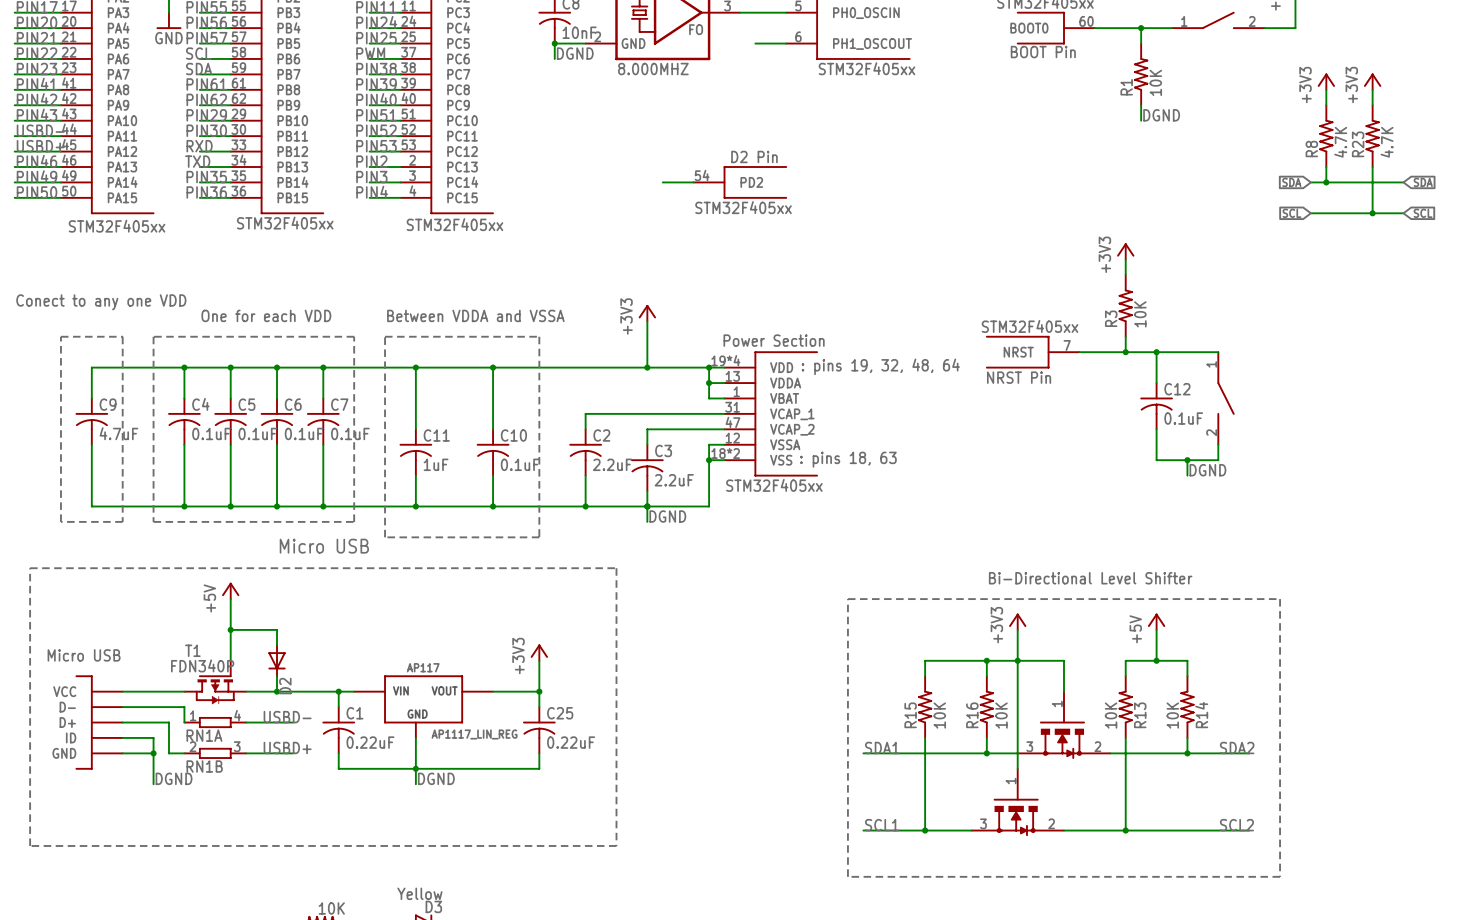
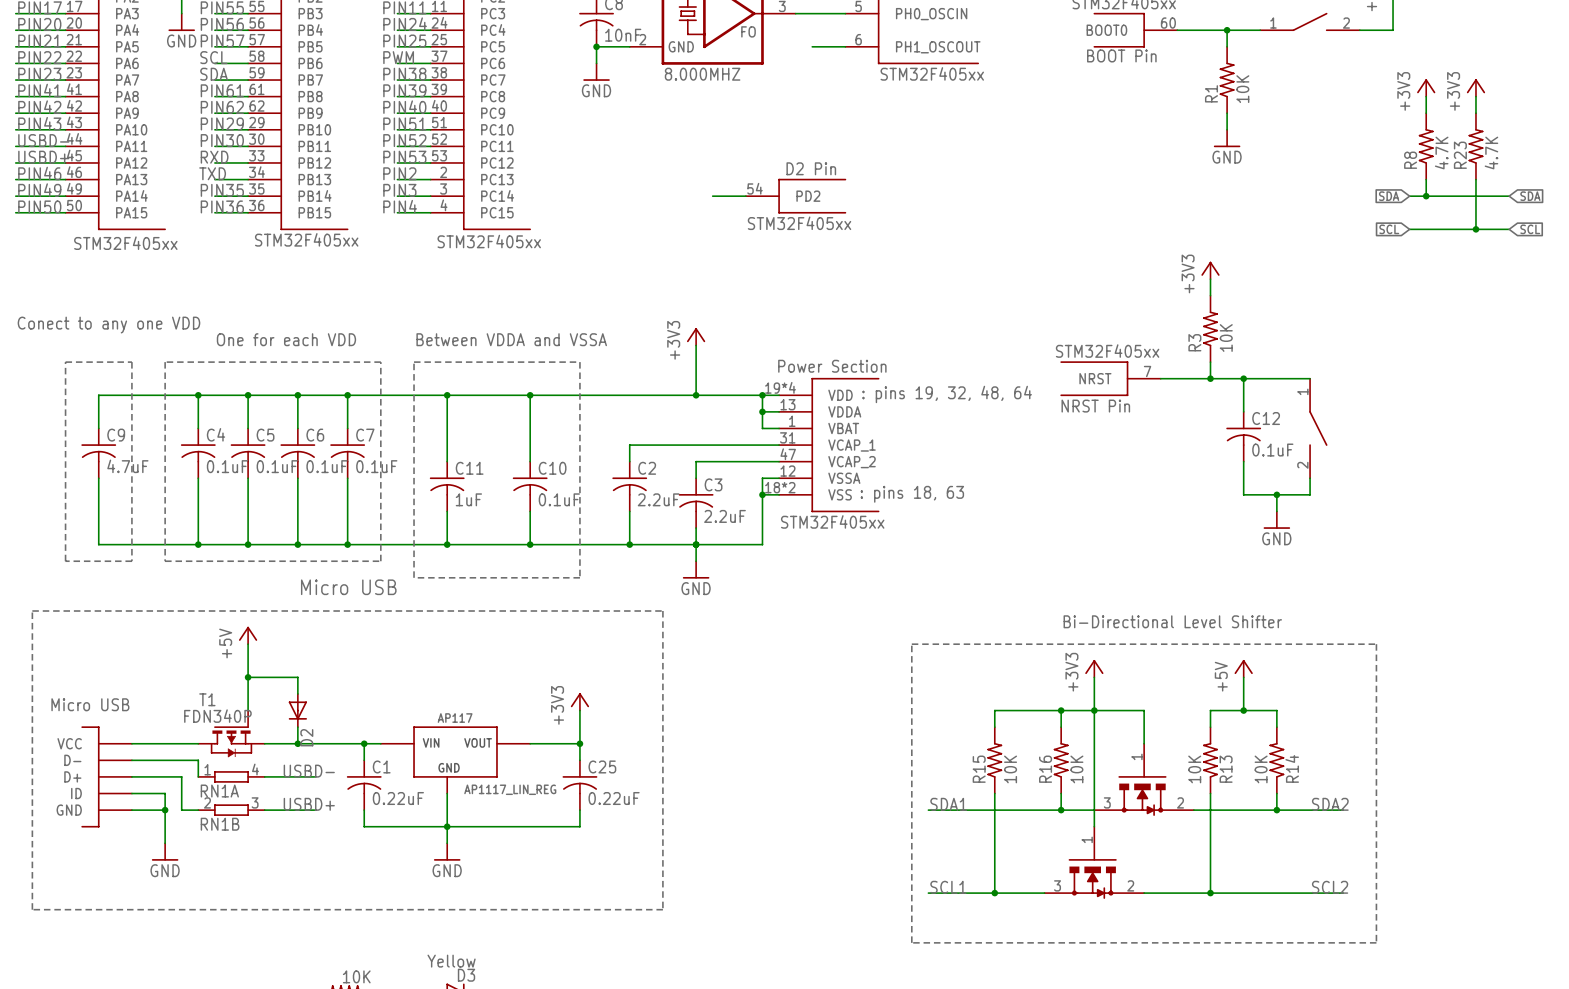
label: DGND (575, 53) -> none
power symbol: none -> GND (596, 72)
label: DGND (1161, 115) -> none
power symbol: none -> GND (1227, 138)
label: DGND (1207, 470) -> none
power symbol: none -> GND (1276, 520)
label: DGND (667, 516) -> none
power symbol: none -> GND (696, 569)
label: DGND (174, 778) -> none
label: DGND (436, 778) -> none
power symbol: none -> GND (165, 852)
power symbol: none -> GND (447, 852)

